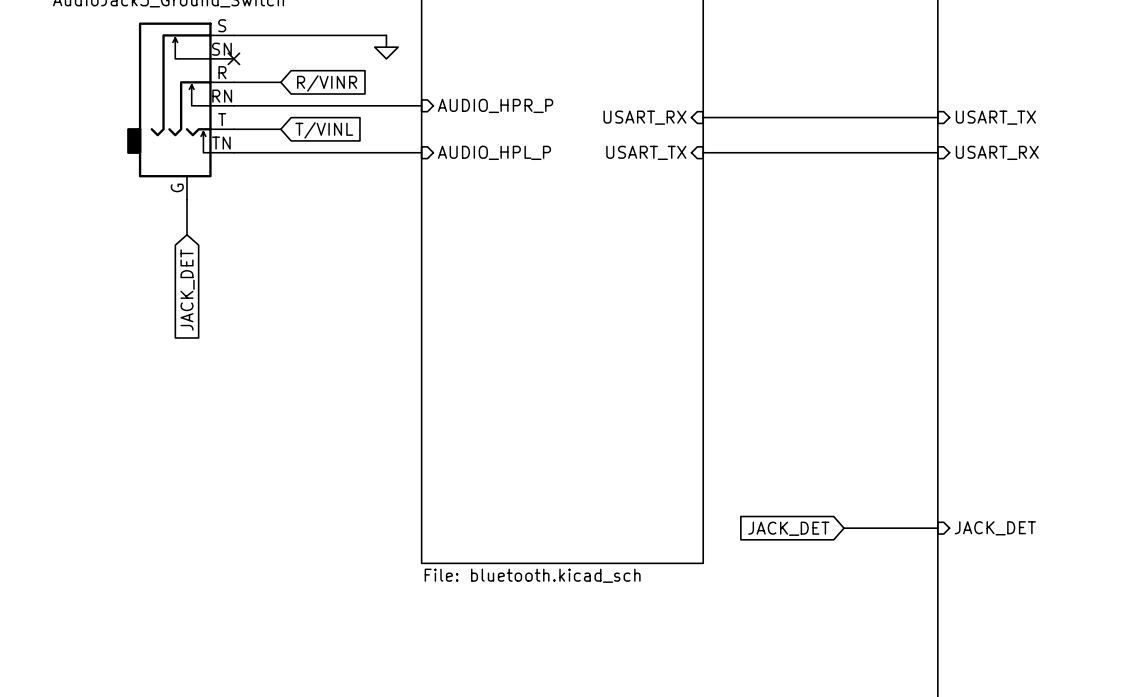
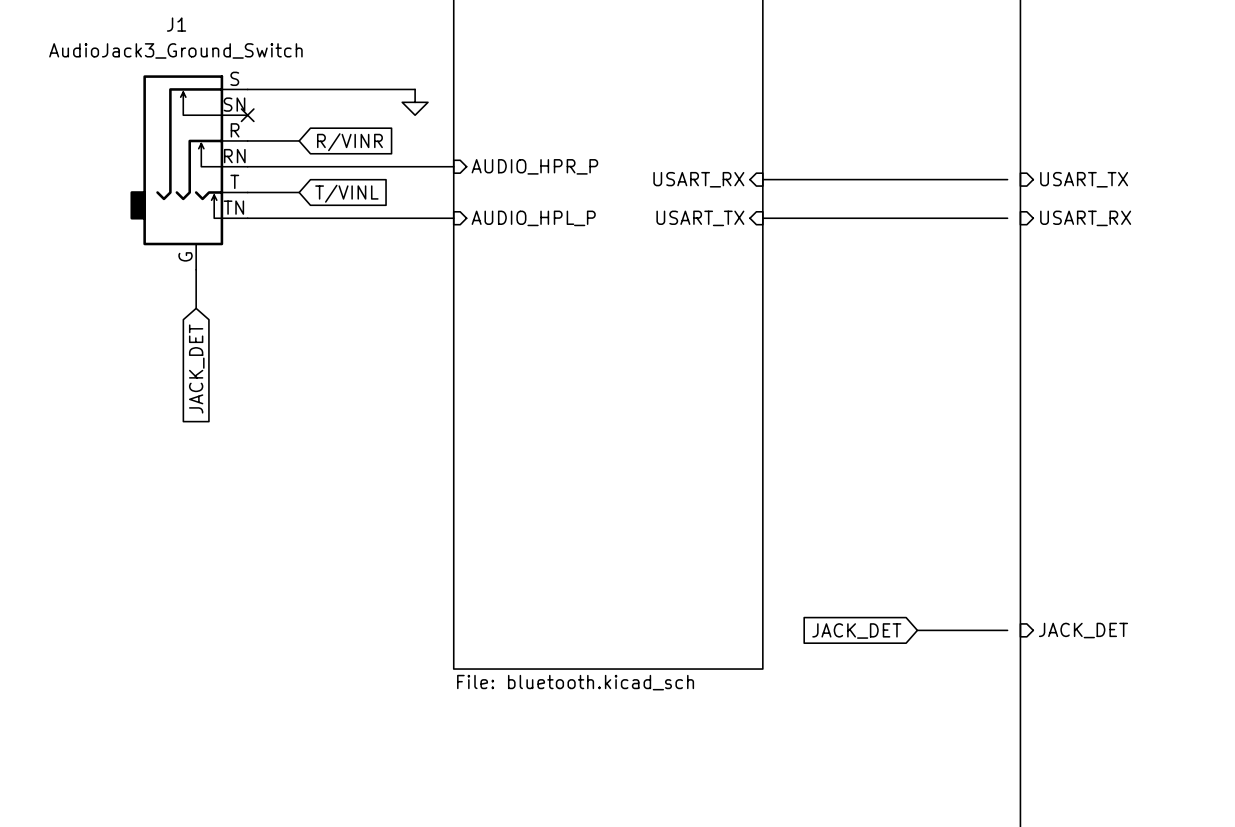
wire: (926, 117) (937, 117) -> none
wire: (926, 152) (937, 152) -> none
wire: (926, 528) (937, 528) -> none

